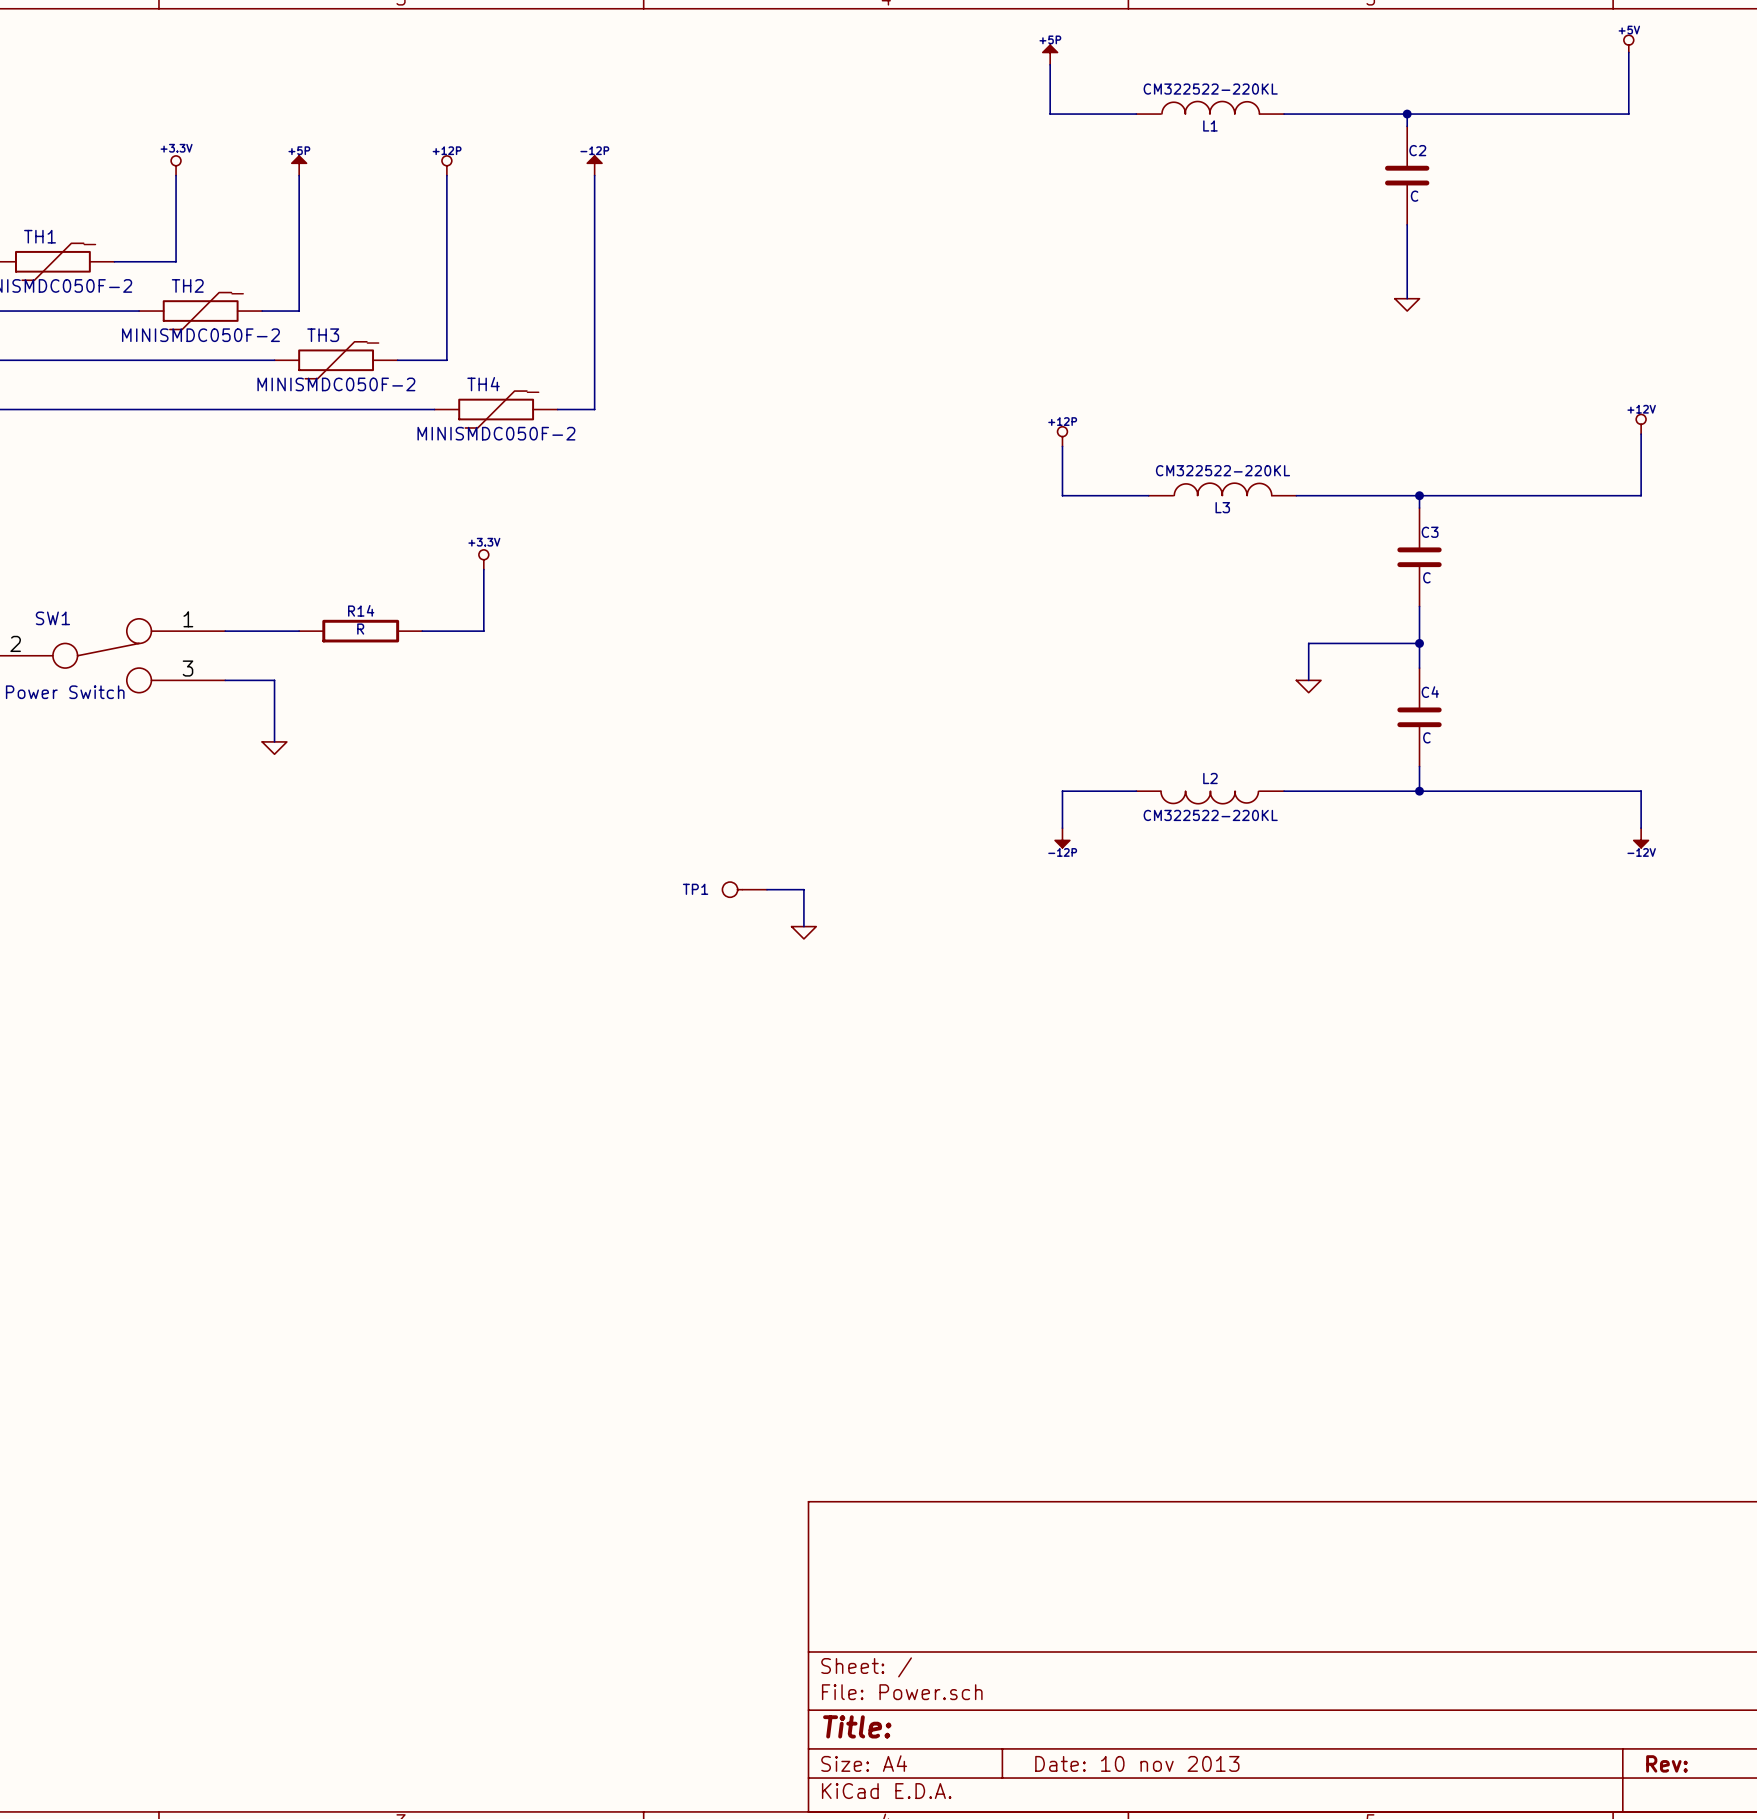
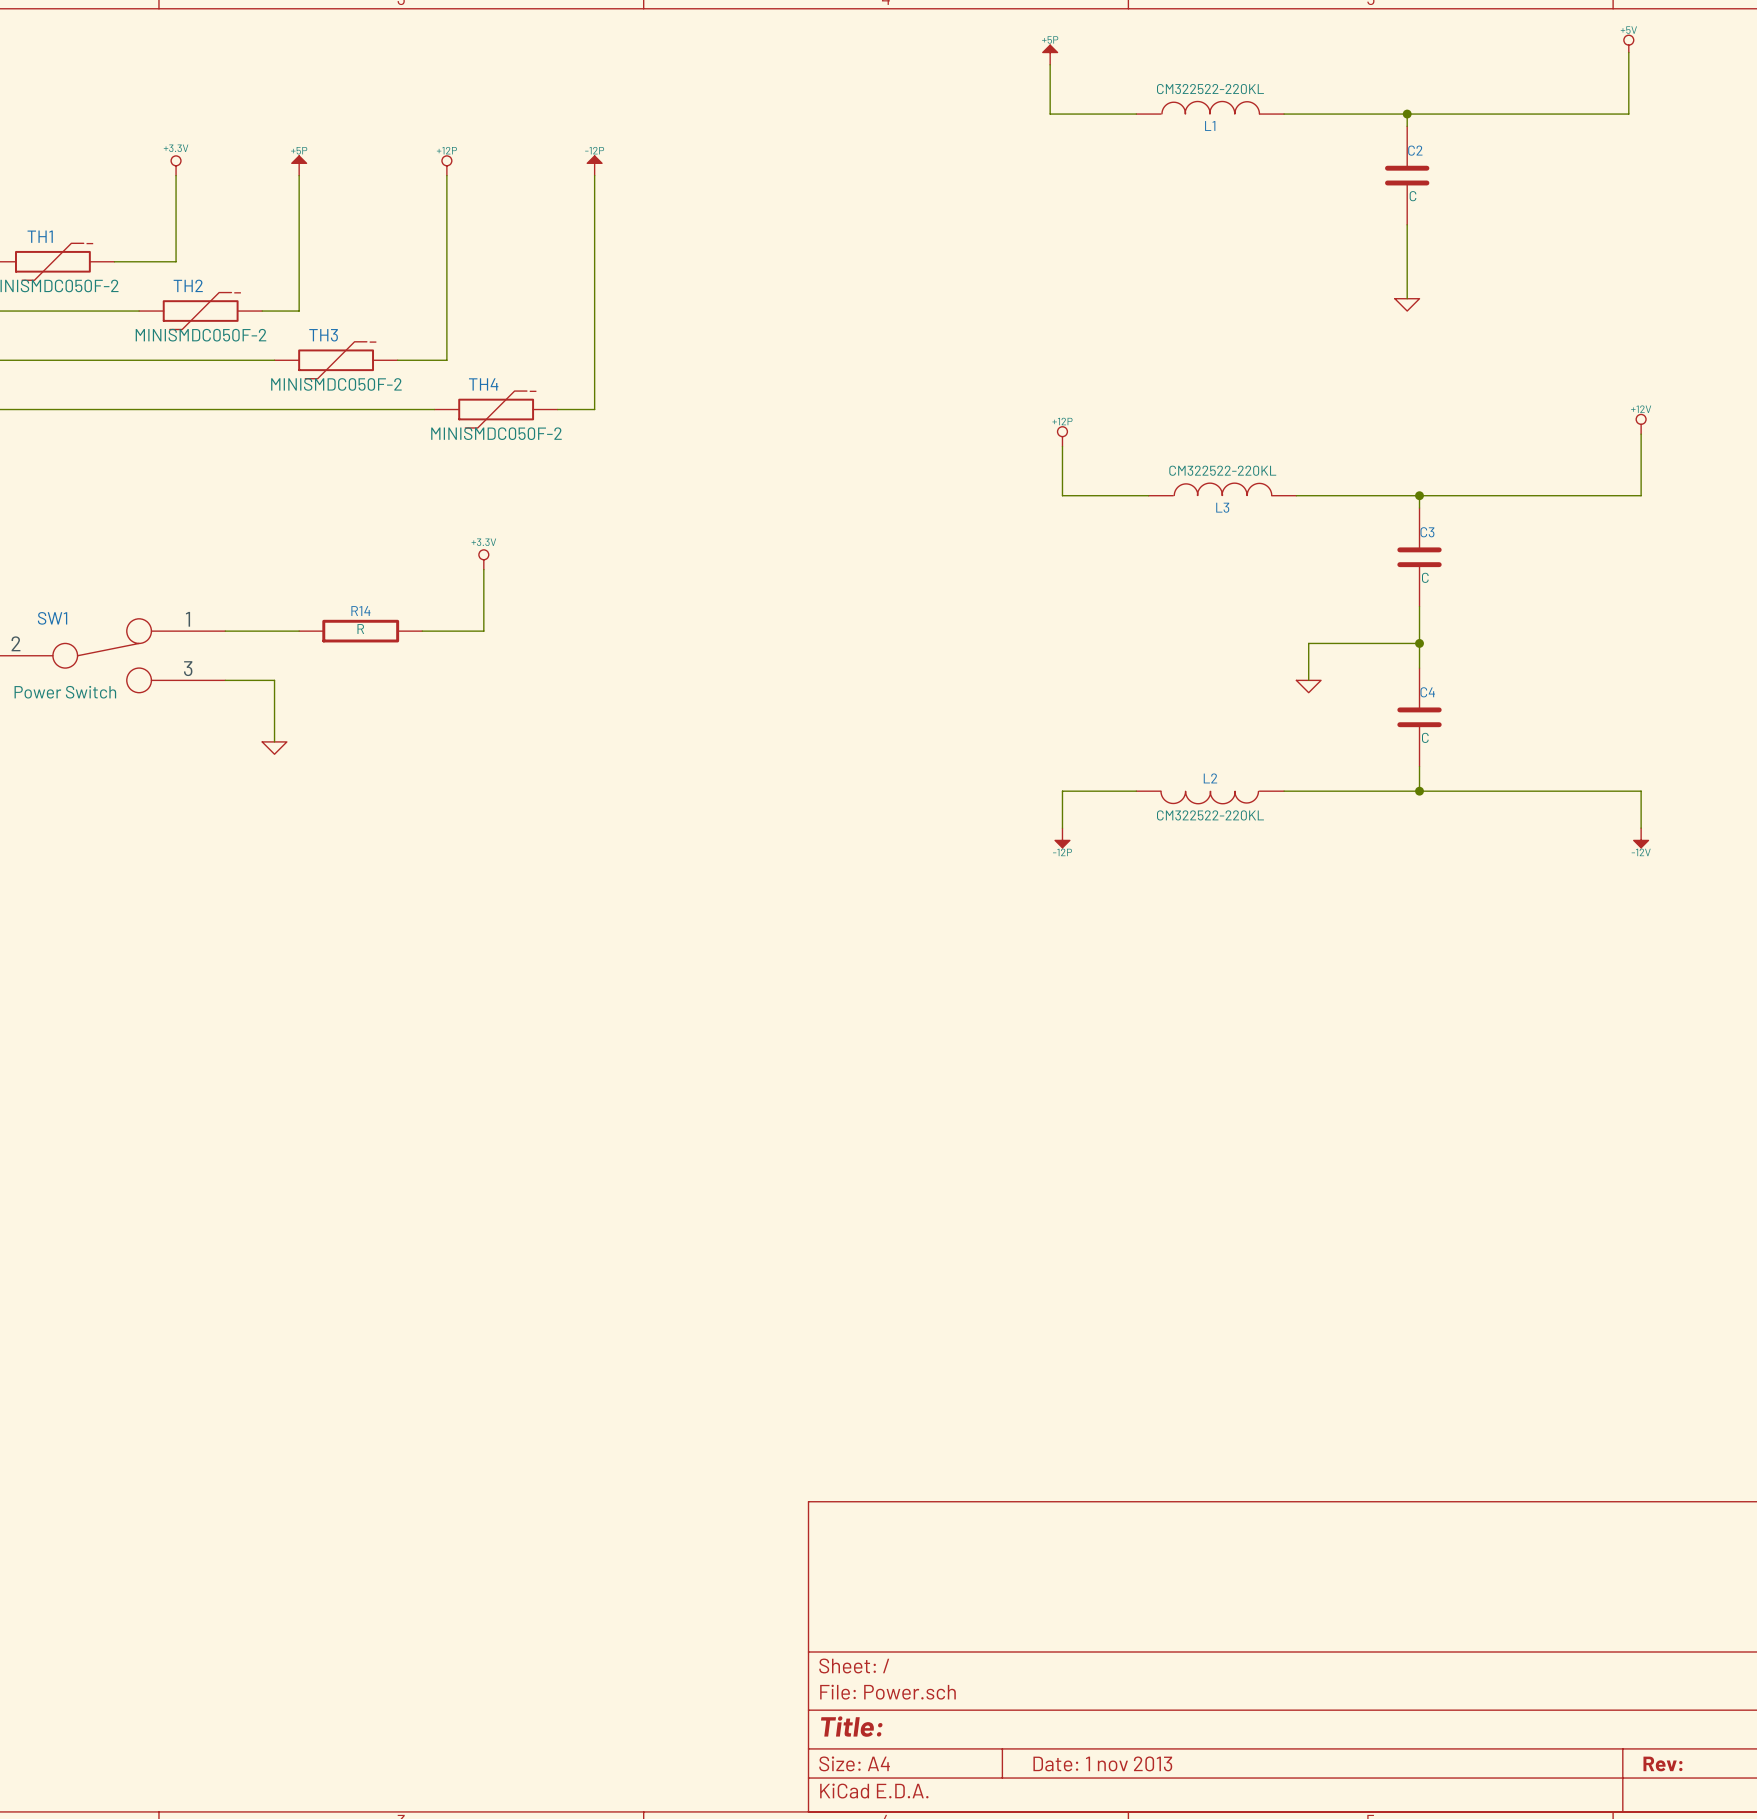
TP1: (744, 889) -> none
wire: (766, 889) (803, 889) (803, 926) -> none
power symbol: (803, 932) -> none
title block: Date: 10 nov 2013 (1137, 1763) -> Date: 1 nov 2013 (1102, 1763)

